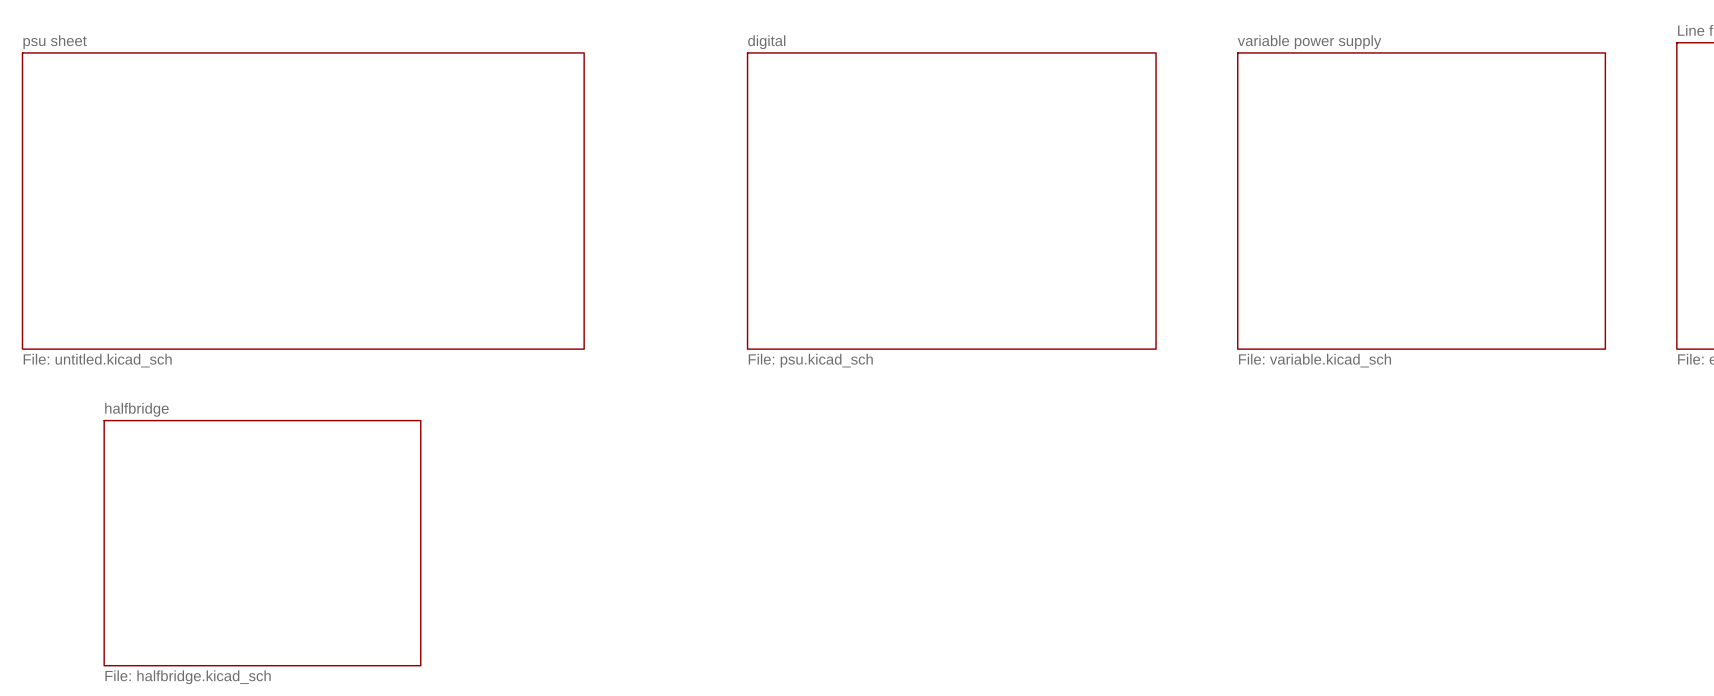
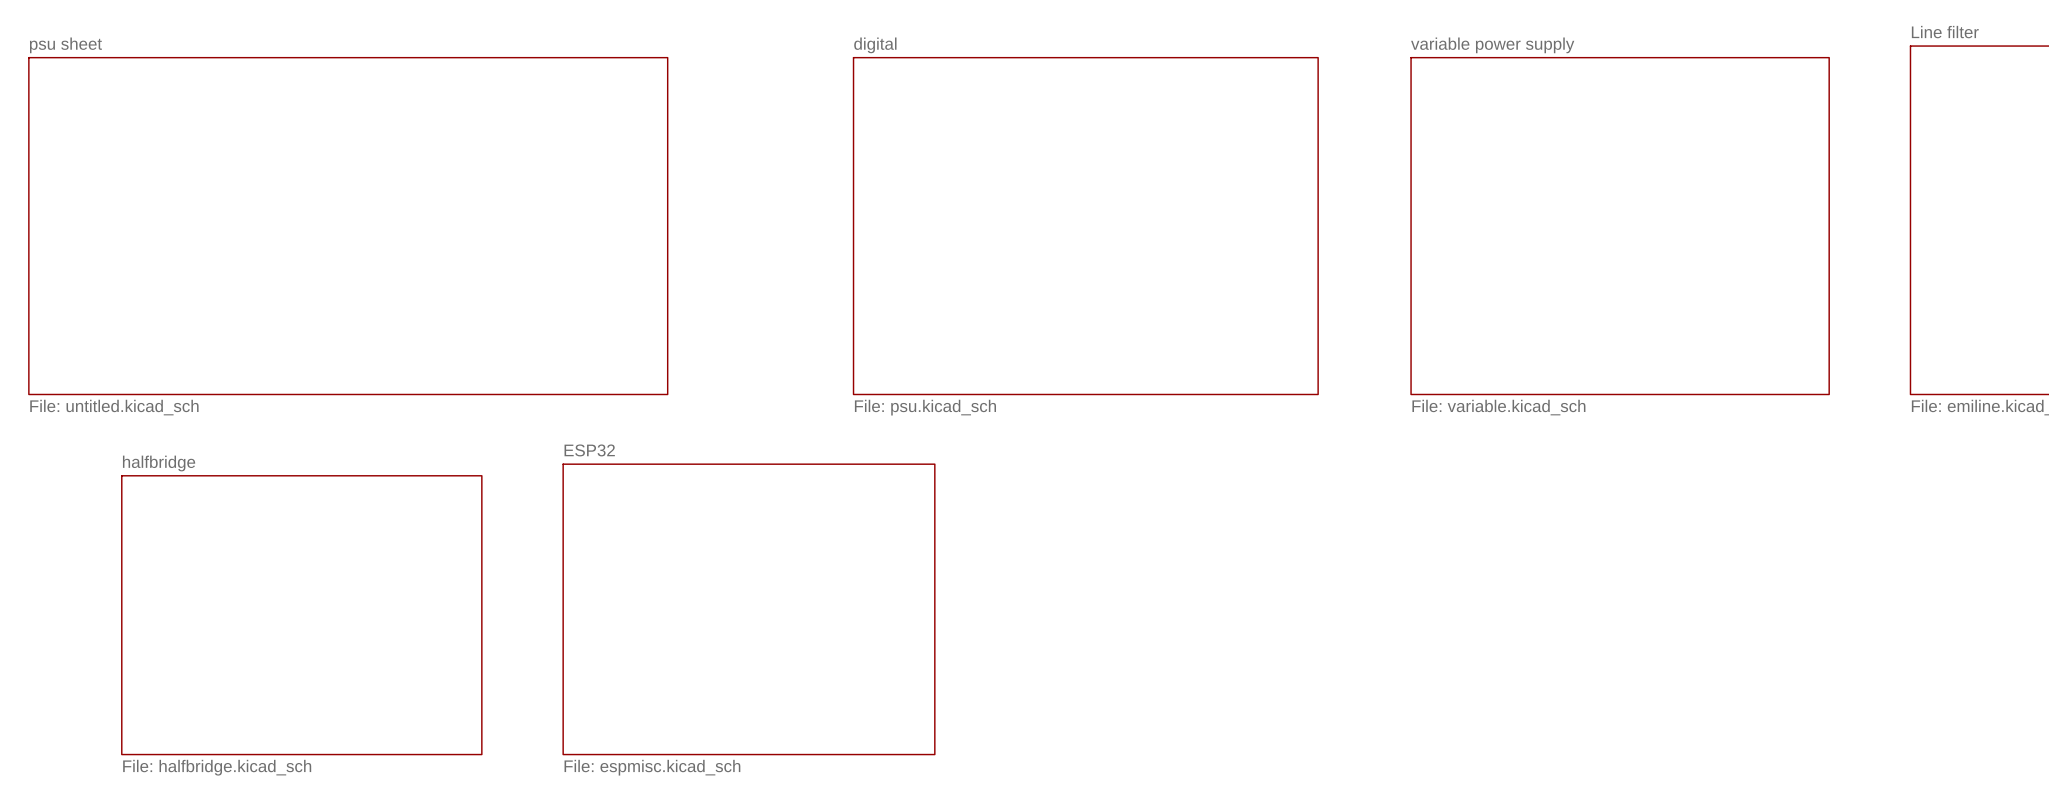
sheet ESP32: none -> File: espmisc.kicad_sch (748, 609)

